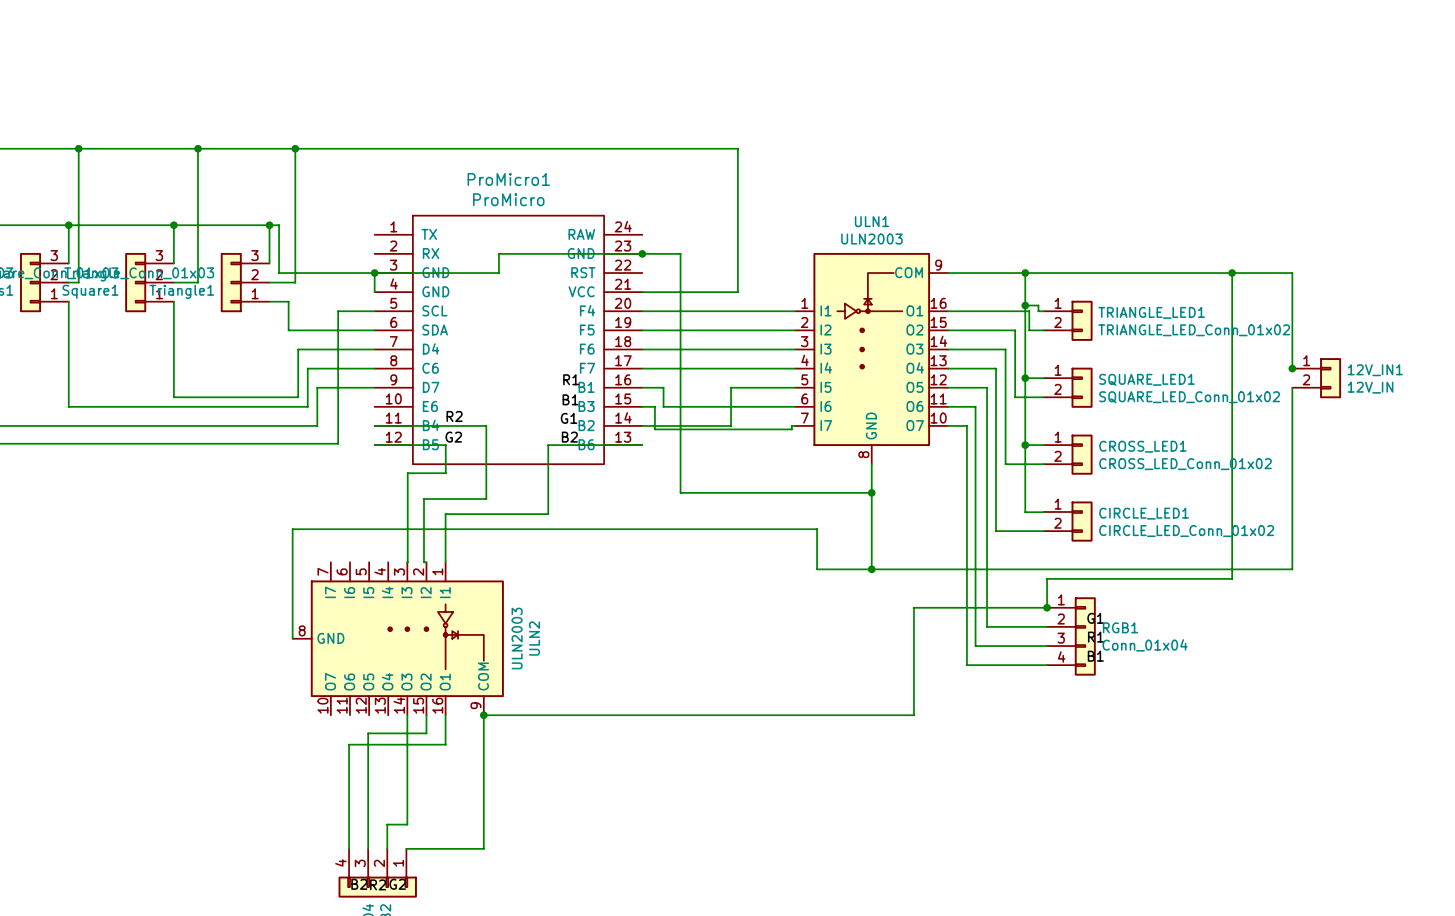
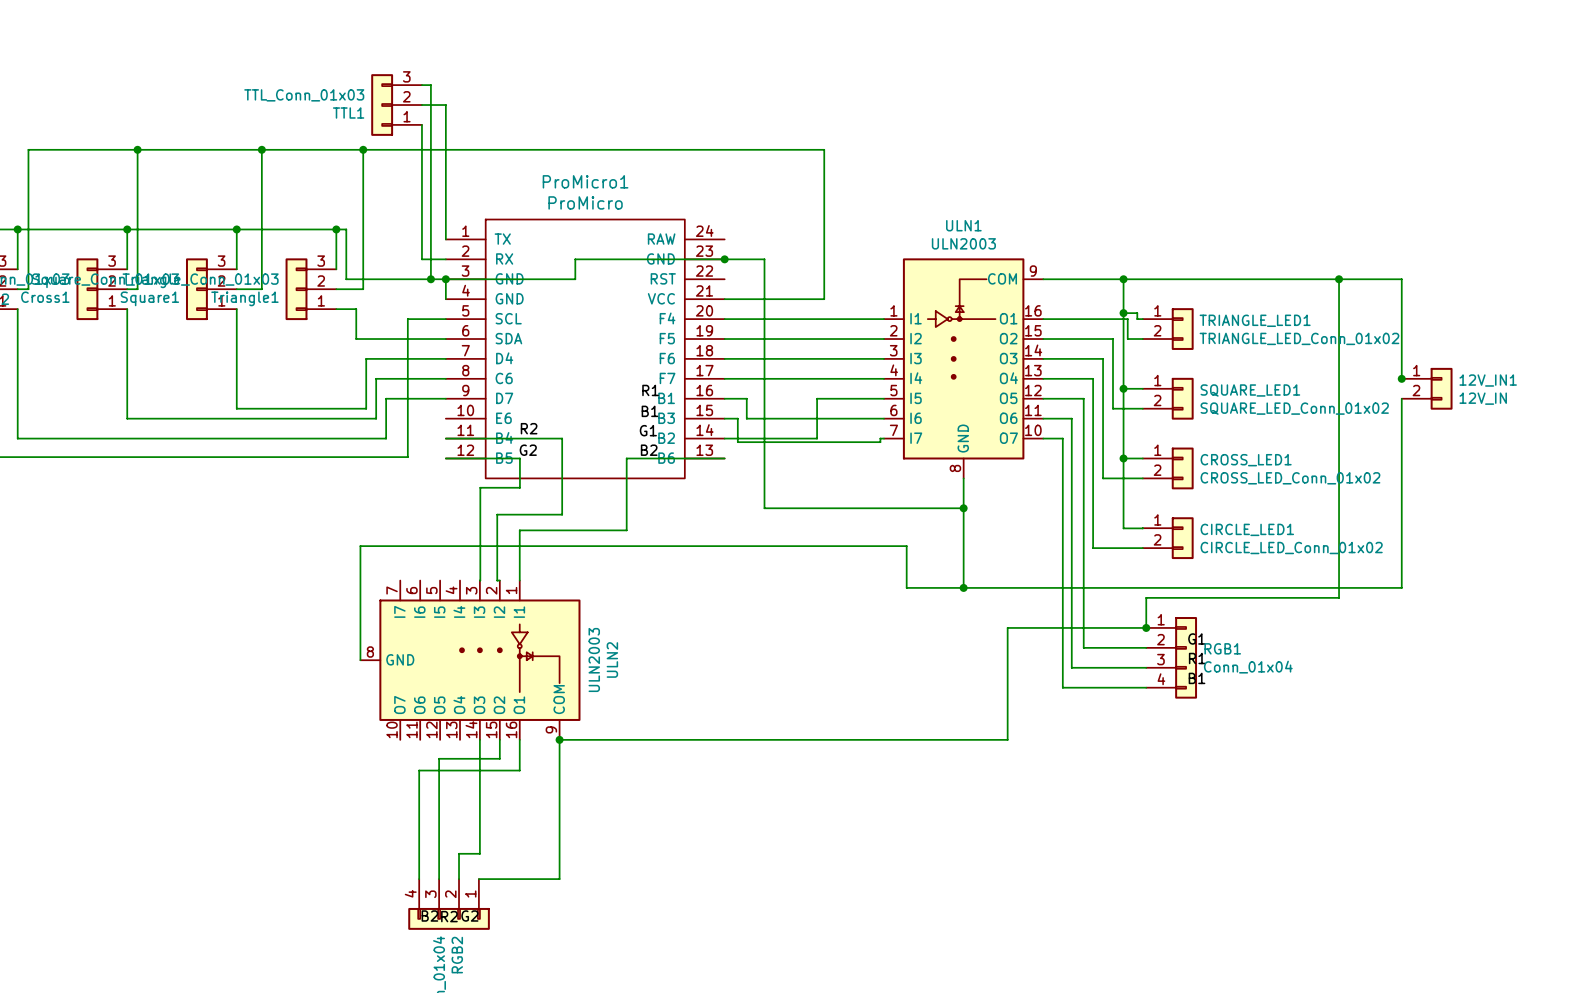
wire: none -> (421, 85) (430, 85) (430, 279)
TTL1: none -> TTL_Conn_01x03 (396, 105)
wire: none -> (421, 105) (445, 105) (445, 239)
wire: none -> (421, 124) (421, 259) (445, 259)
junction: none -> (430, 279)

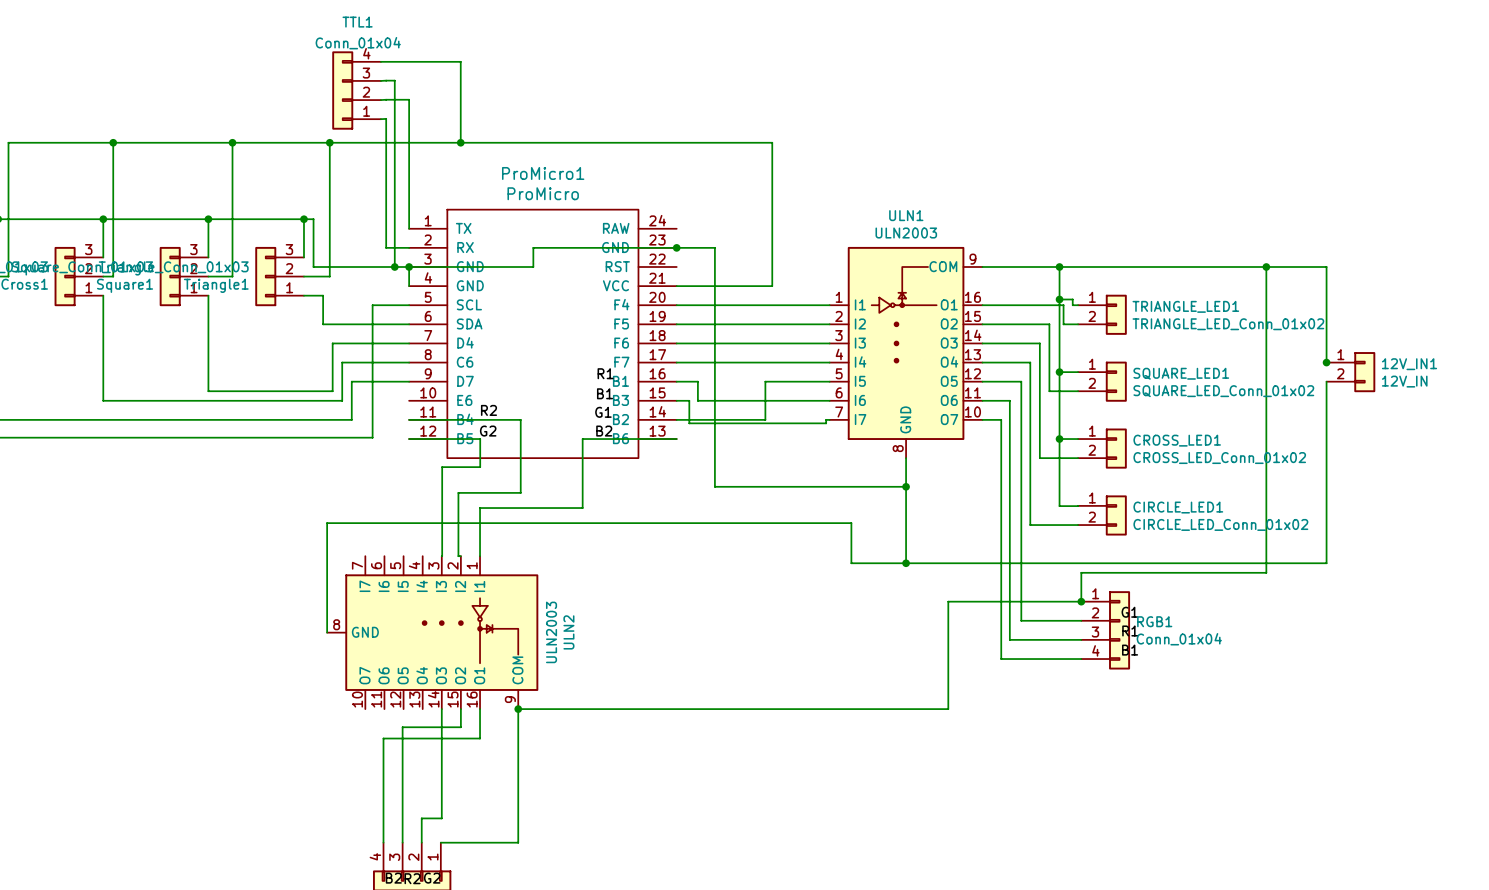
wire: none -> (380, 61) (460, 61) (460, 142)
TTL1 symbol: [371, 74, 422, 136] -> [332, 51, 381, 130]
TTL1 value: TTL_Conn_01x03 (304, 95) -> Conn_01x04 (358, 43)
TTL1 name position: TTL1 (348, 113) -> TTL1 (357, 22)
junction: none -> (460, 142)

